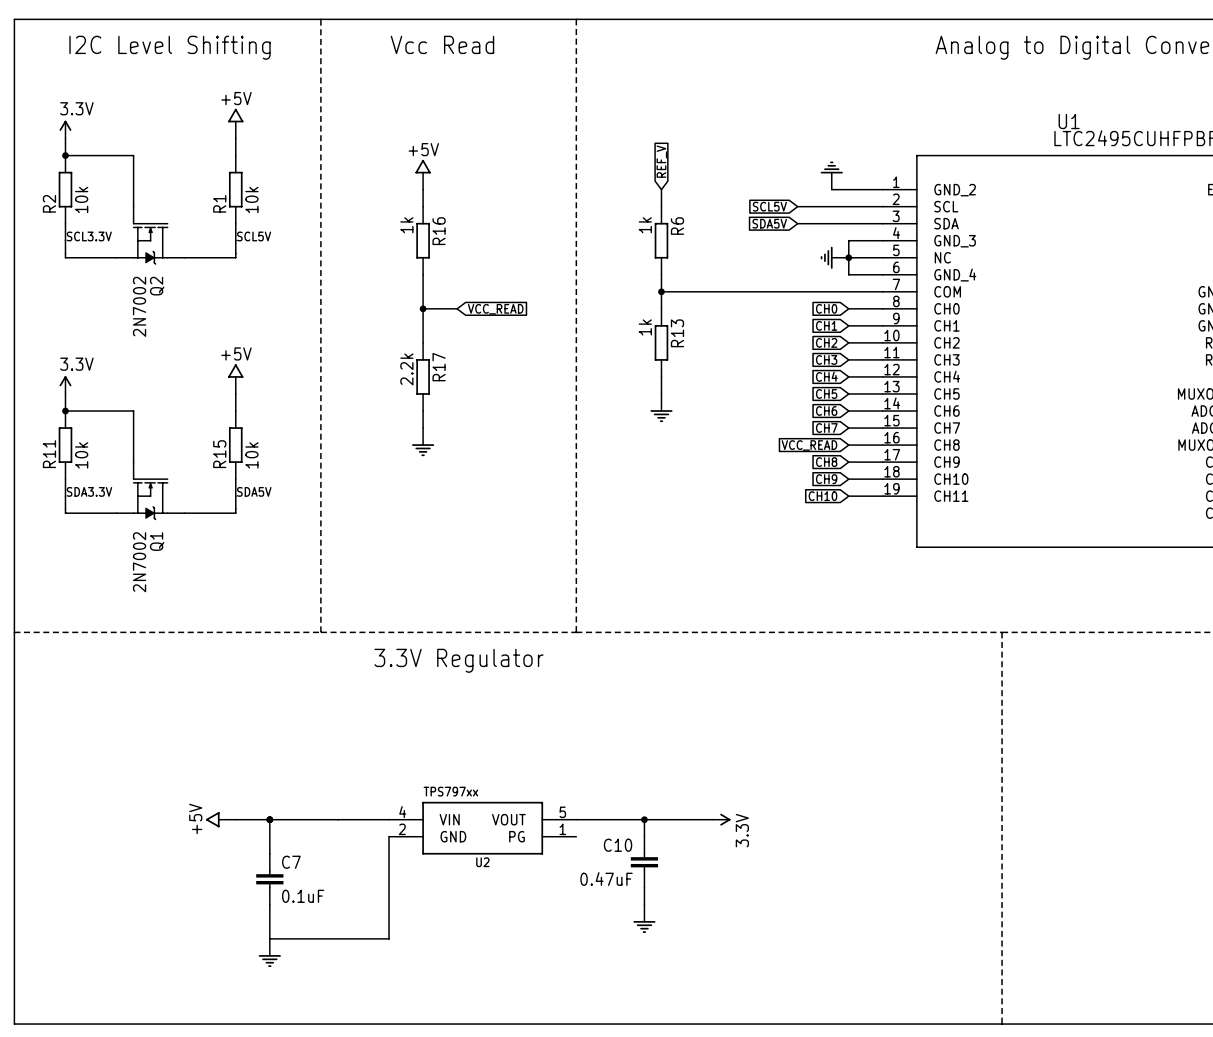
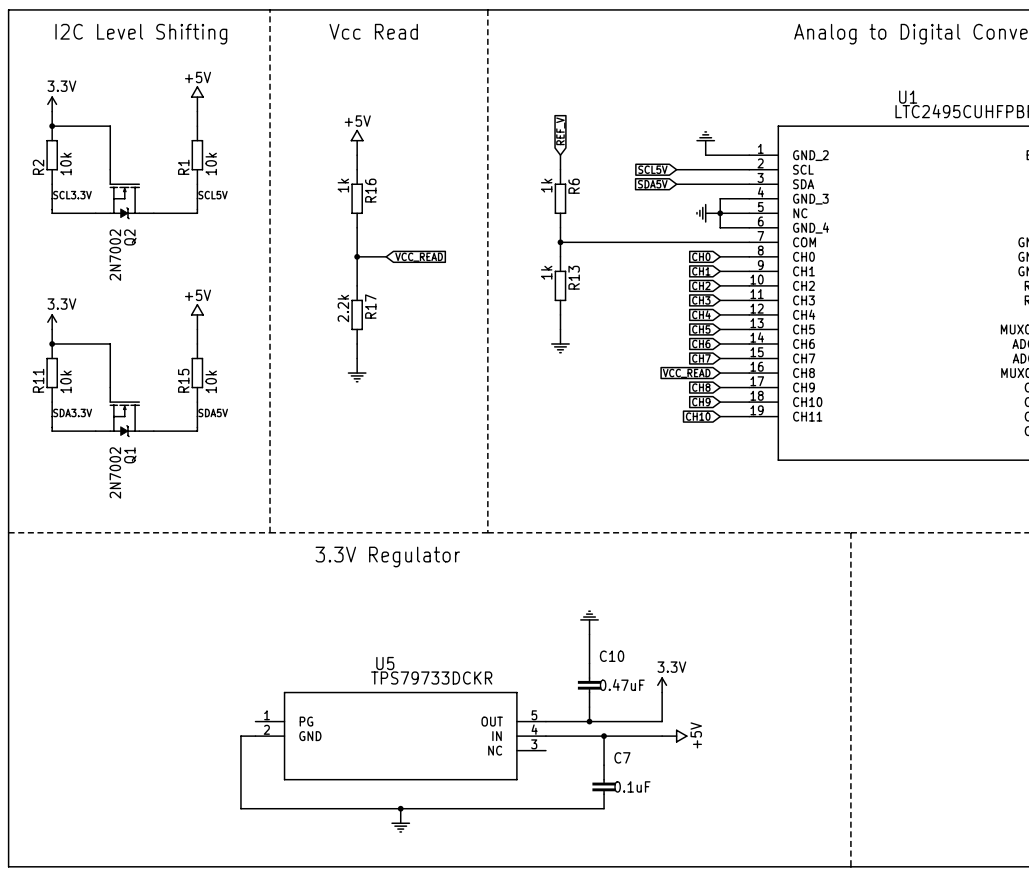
power symbol: none -> (589, 622)
wire: none -> (589, 634) (589, 663)
power symbol: +5V (220, 819) -> none
wire: (235, 819) (389, 819) -> none
wire: (269, 819) (269, 853) -> none
junction: (269, 819) -> none
wire: (576, 819) (712, 819) -> (545, 736) (662, 736)
wire: (644, 819) (644, 836) -> (589, 707) (589, 721)
junction: (644, 819) -> none
power symbol position: 3.3V (721, 819) -> 3.3V (662, 684)
power symbol rotation: 0° (725, 819) -> 90° counterclockwise (662, 681)
wire: none -> (662, 692) (662, 721) (545, 721)
U2: (482, 828) -> none
wire: (389, 836) (389, 938) (269, 938) (269, 904) -> none
C10 name position: C10 (618, 845) -> C10 (612, 656)
junction: none -> (589, 721)
C7 name position: C7 (291, 862) -> C7 (622, 757)
C10 position: (644, 862) -> (589, 685)
wire: none -> (255, 736) (240, 736) (240, 808) (604, 808)
U5: none -> TPS79733DCKR (400, 736)
wire: none -> (604, 736) (604, 765)
junction: none -> (604, 736)
power symbol: none -> +5V (674, 736)
C7 position: (269, 879) -> (604, 786)
C10 value position: 0.47uF (606, 879) -> 0.47uF (622, 685)
wire: (644, 887) (644, 904) -> none
C7 value position: 0.1uF (303, 896) -> 0.1uF (632, 786)
power symbol: (644, 918) -> none
power symbol: (269, 952) -> none
junction: none -> (400, 808)
power symbol: none -> (400, 820)

